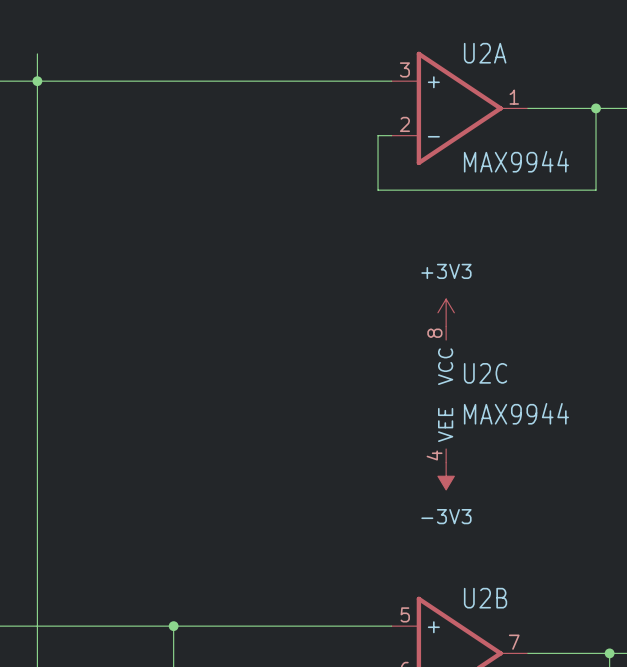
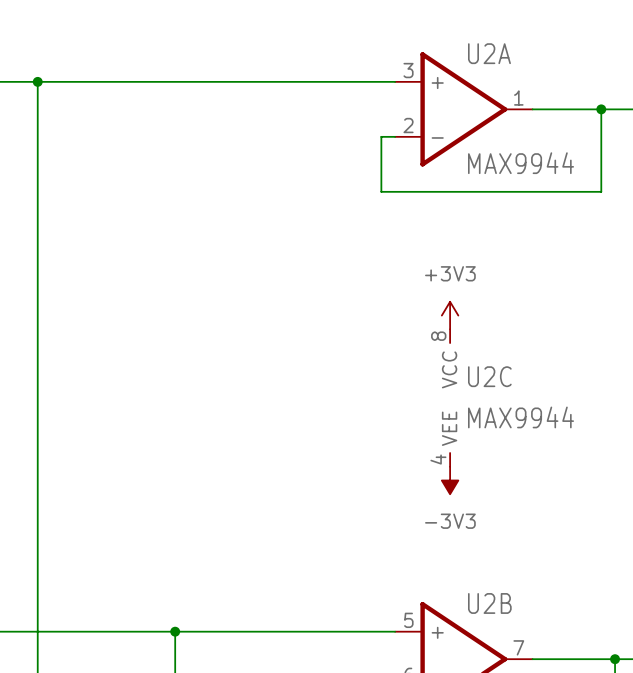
wire: (37, 53) (37, 81) -> none

